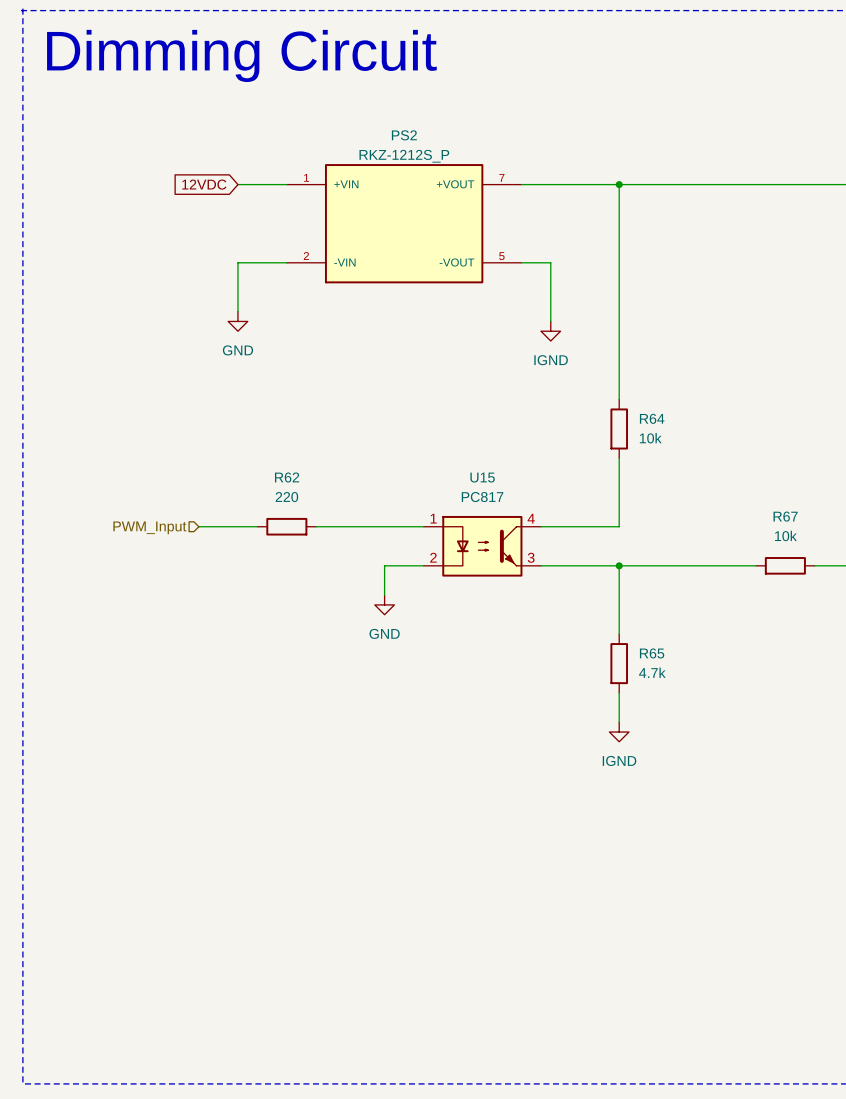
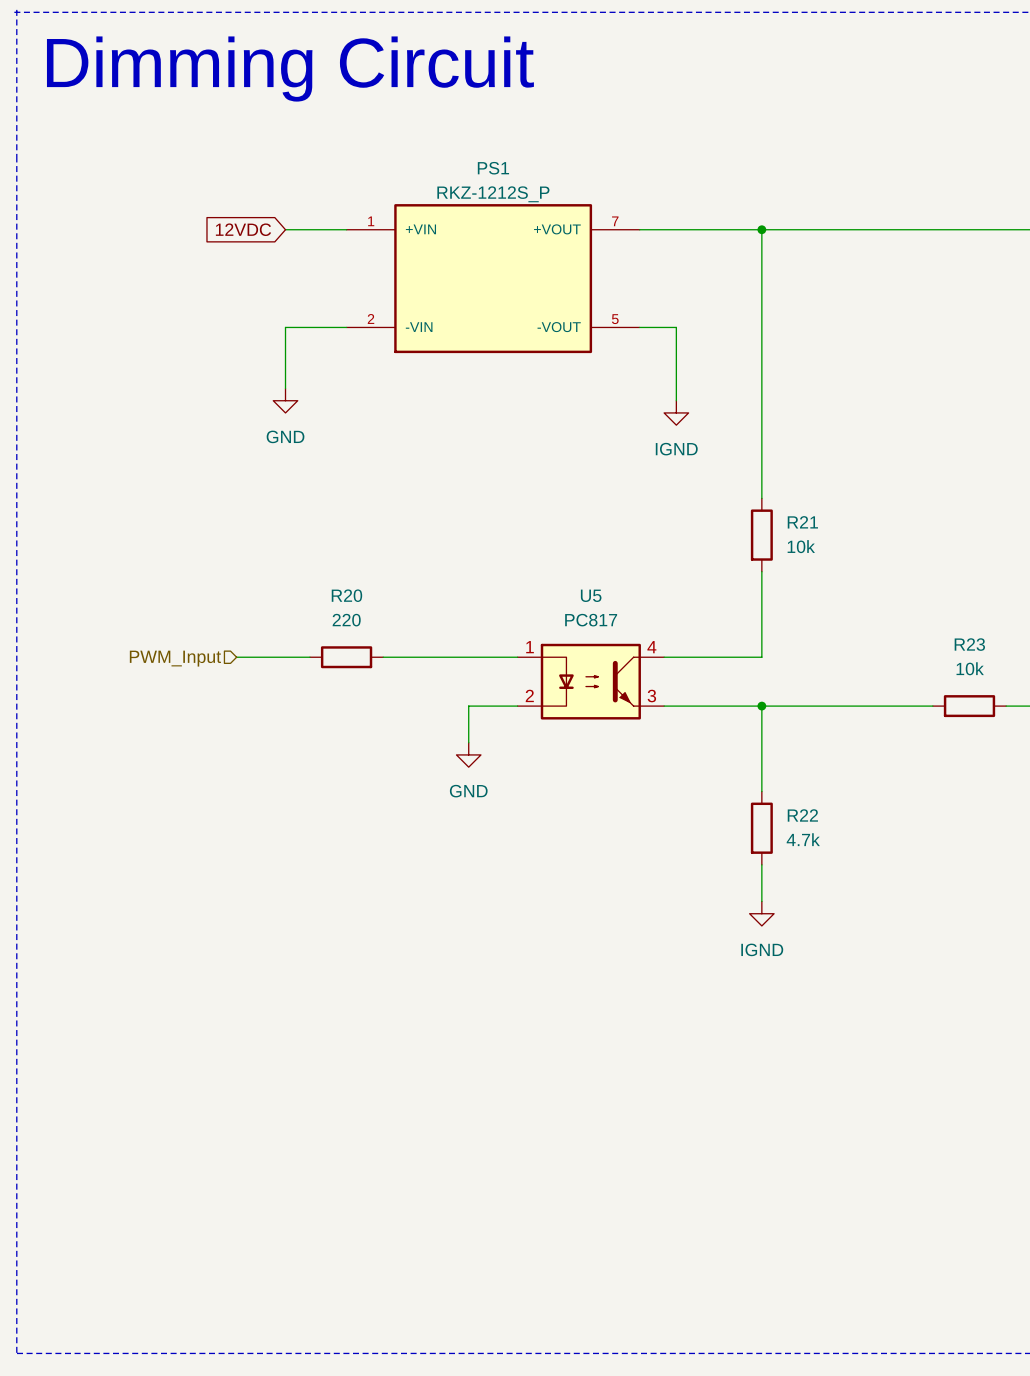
PS2 name: PS2 (404, 135) -> PS1 (493, 168)
R64 name: R64 (652, 418) -> R21 (802, 522)
R62 name: R62 (287, 477) -> R20 (346, 595)
U15 name: U15 (482, 477) -> U5 (591, 595)
R67 name: R67 (785, 516) -> R23 (969, 644)
R65 name: R65 (652, 653) -> R22 (802, 815)

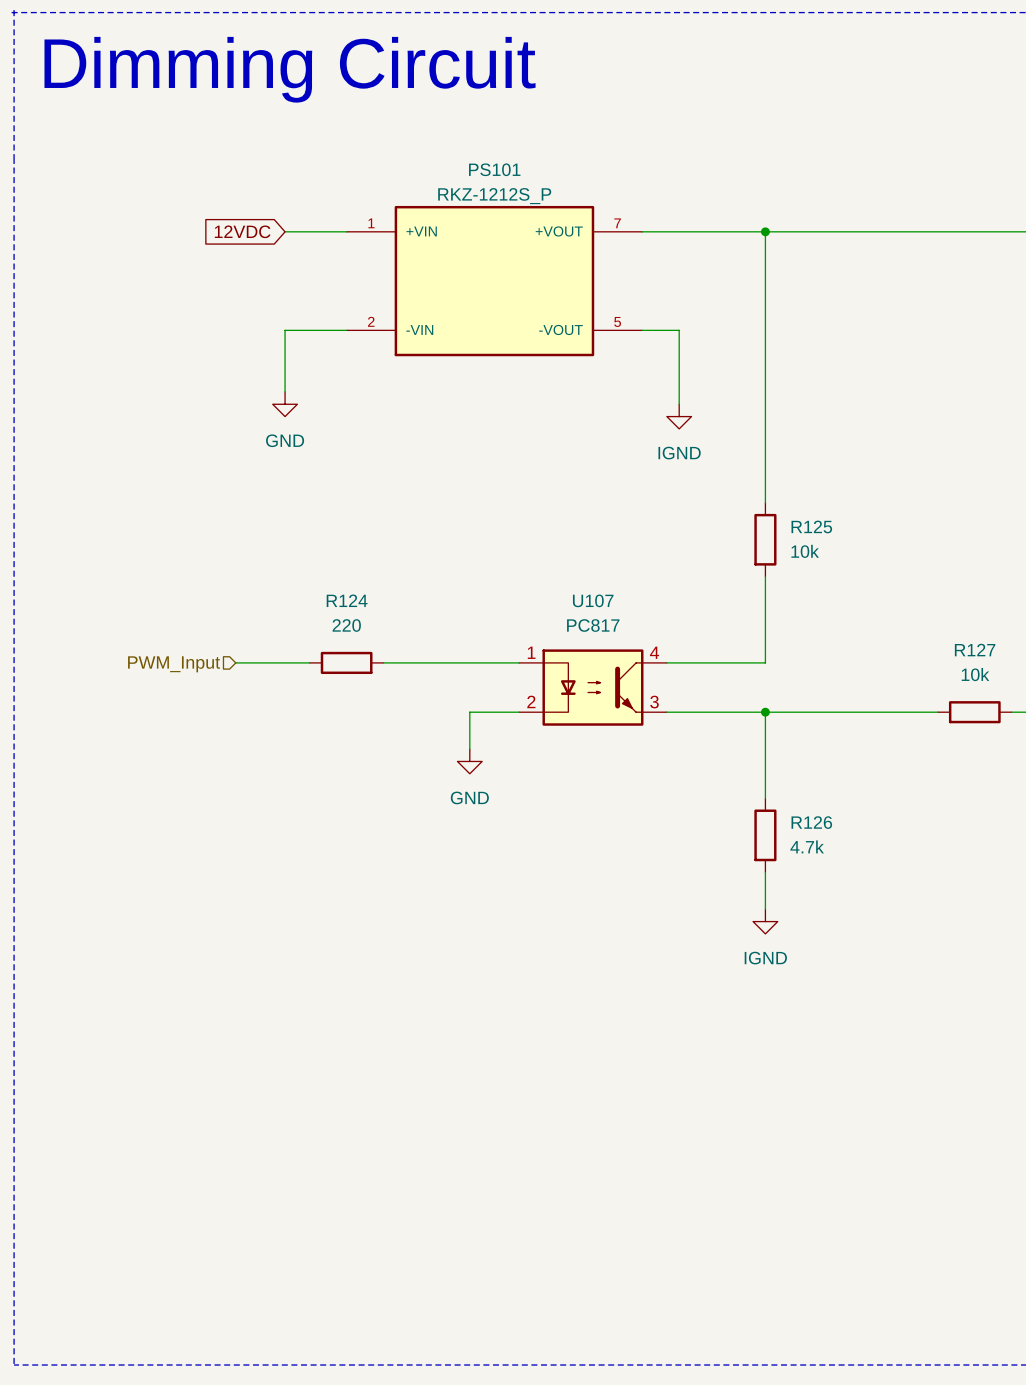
PS1 name: PS1 (493, 168) -> PS101 (494, 169)
R21 name: R21 (802, 522) -> R125 (811, 526)
R20 name: R20 (346, 595) -> R124 (347, 600)
U5 name: U5 (591, 595) -> U107 (593, 600)
R23 name: R23 (969, 644) -> R127 (975, 650)
R22 name: R22 (802, 815) -> R126 (811, 822)

